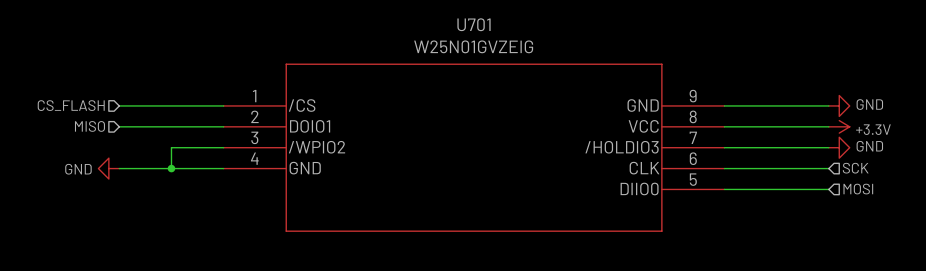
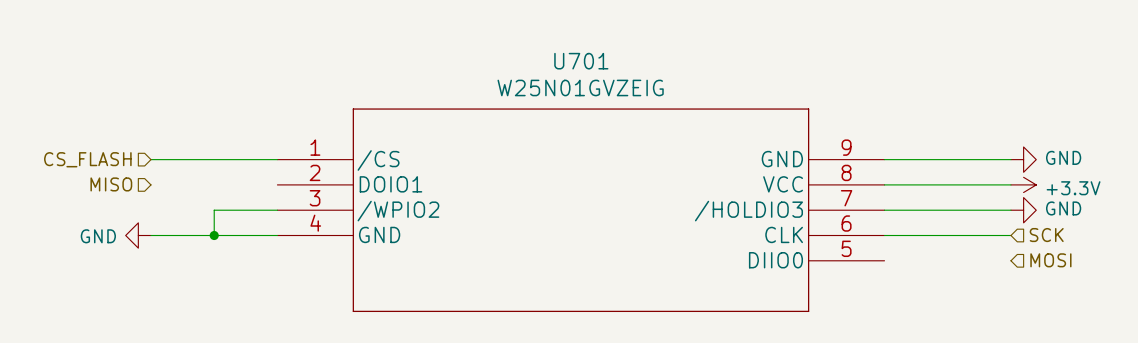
wire: (119, 126) (223, 126) -> none
wire: (724, 189) (828, 189) -> none

